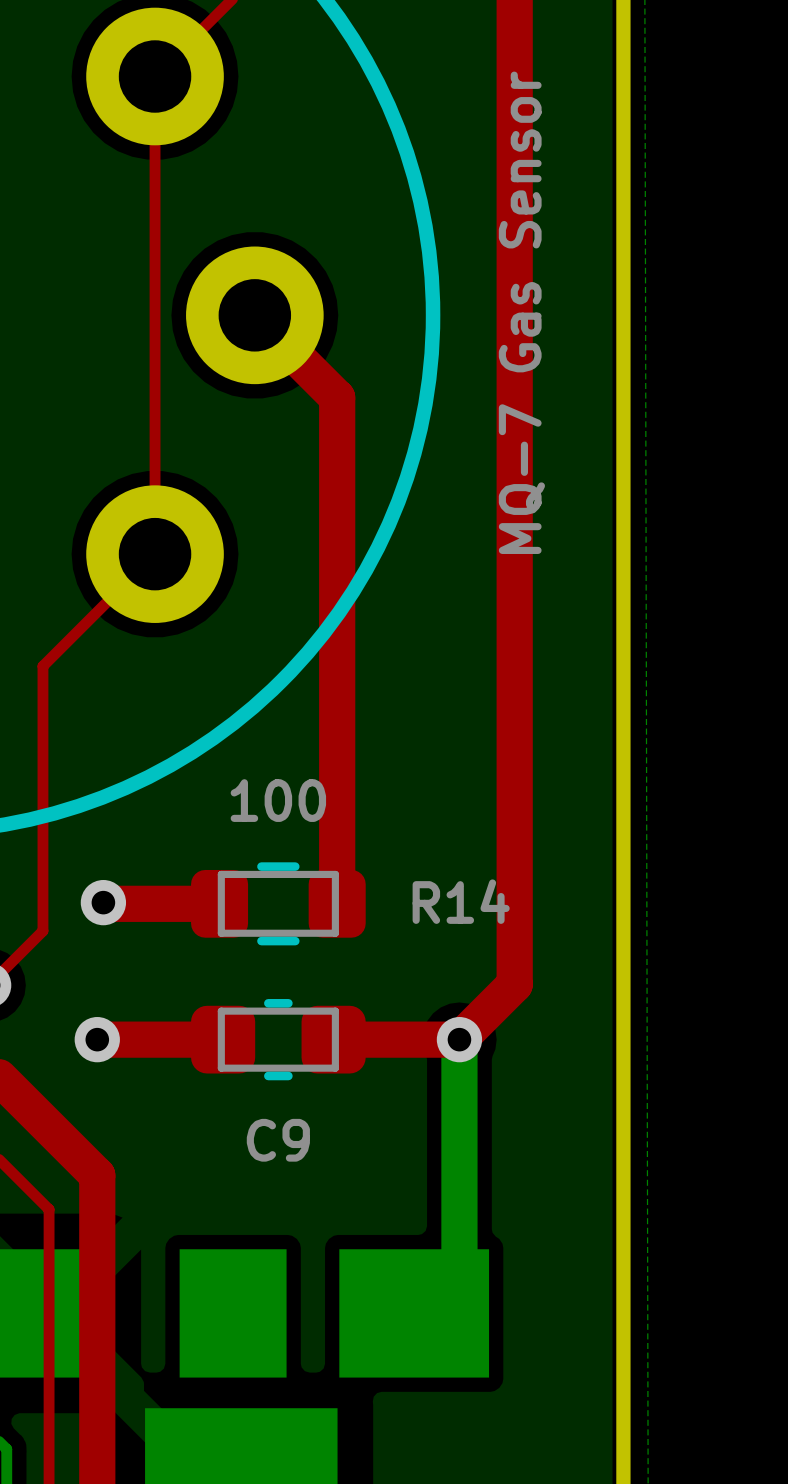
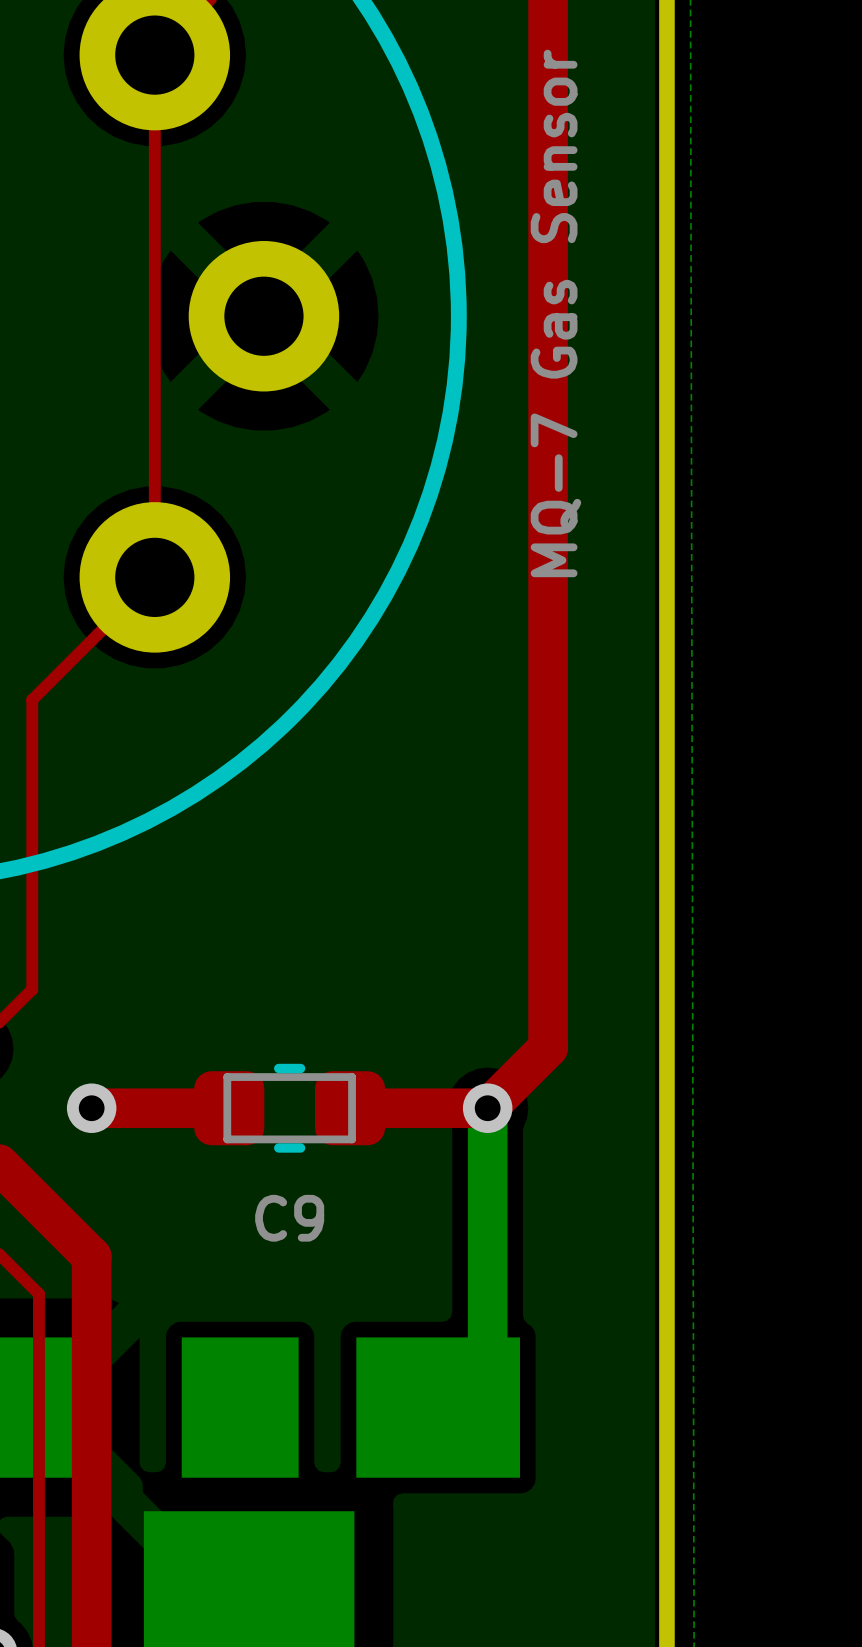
top track: (254, 315) (337, 397) (337, 903) -> none
top track: (103, 902) (219, 903) -> none
via: (103, 902) -> none
R14: 100 (278, 903) -> none

